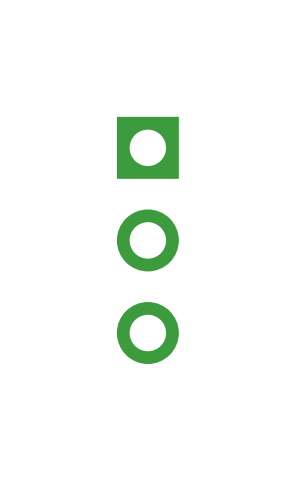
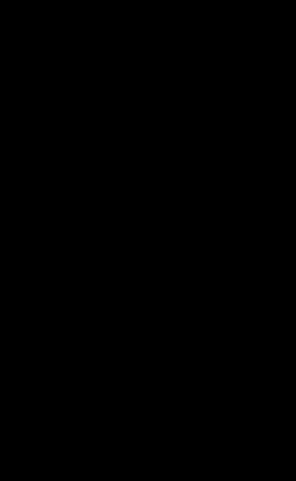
part: (147, 240) -> none

